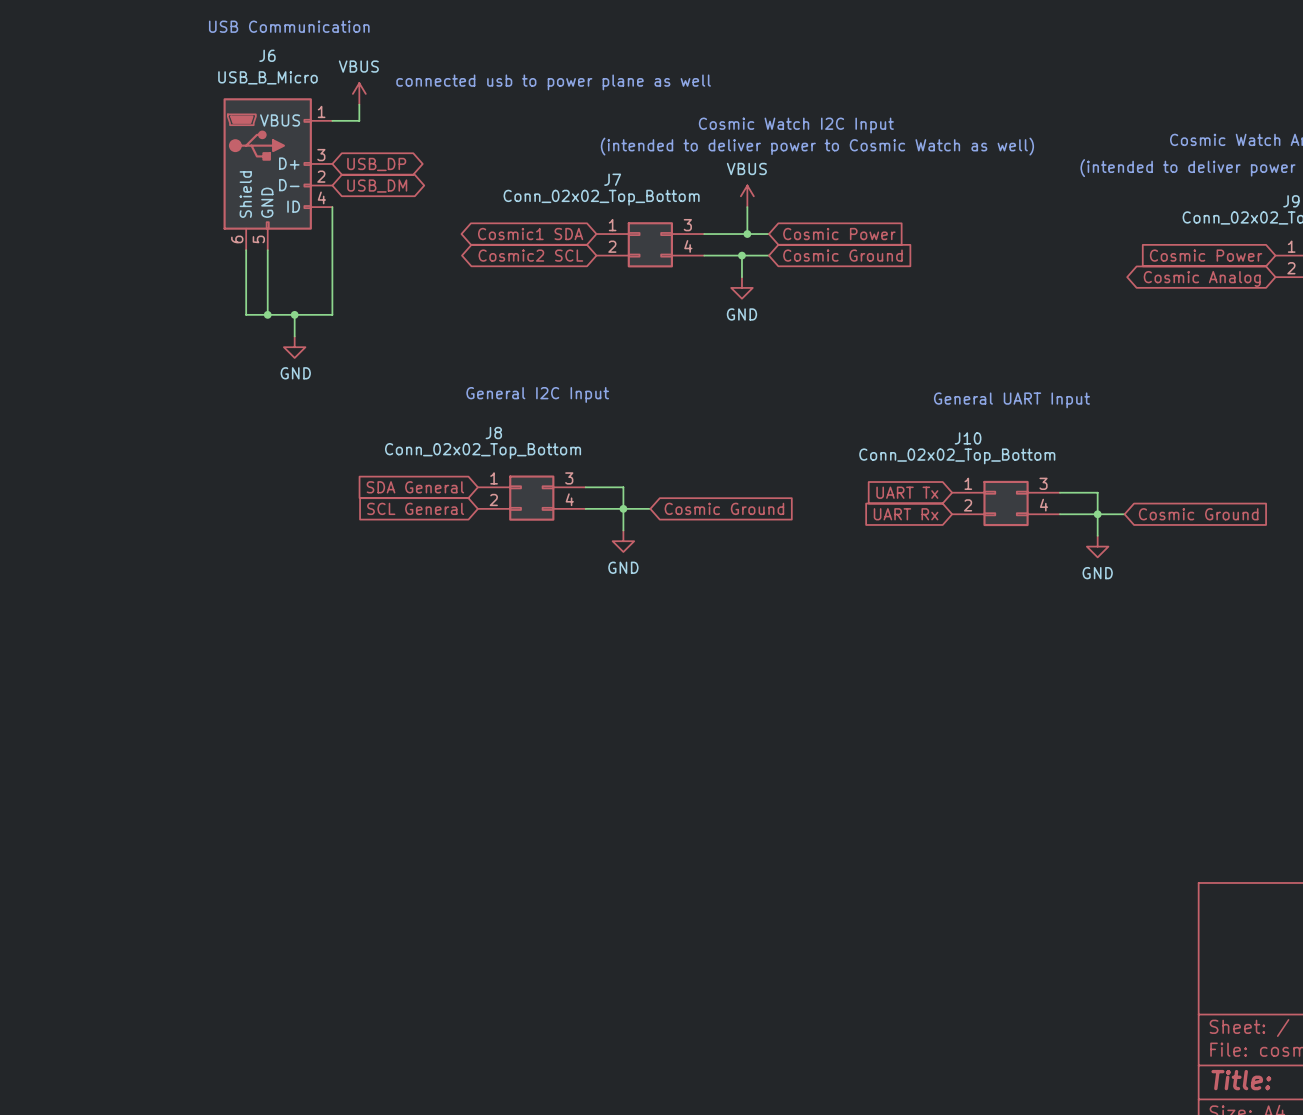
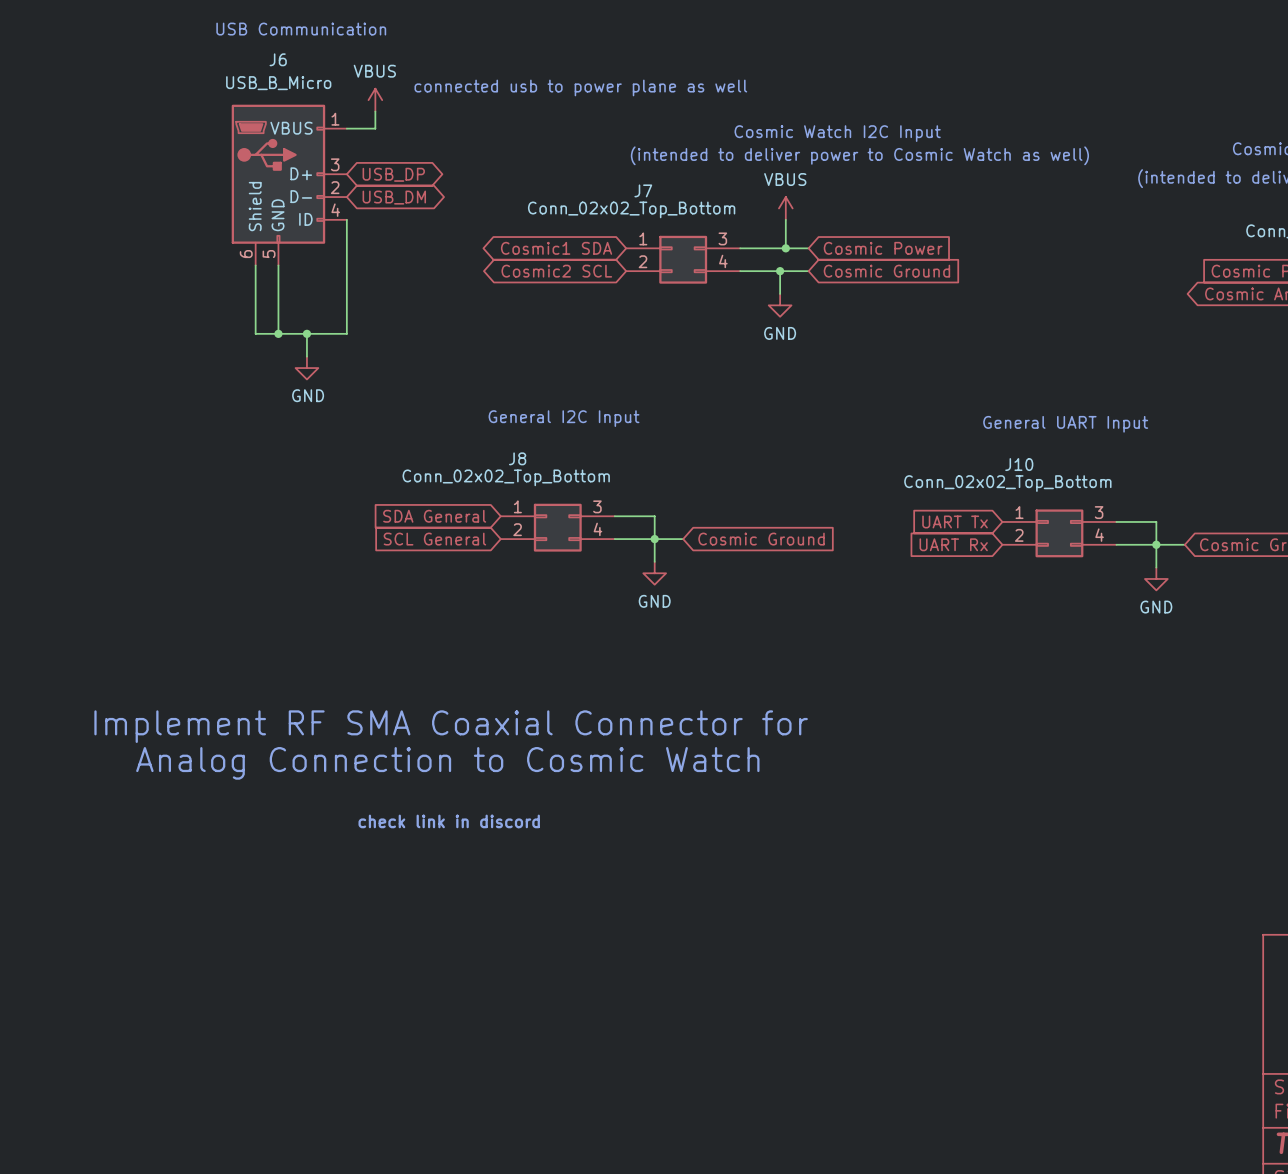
text: none -> Implement RF SMA Coaxial Connector for (451, 726)
text: none -> Analog Connection to Cosmic Watch (447, 763)
text: none -> check link in discord (449, 821)

